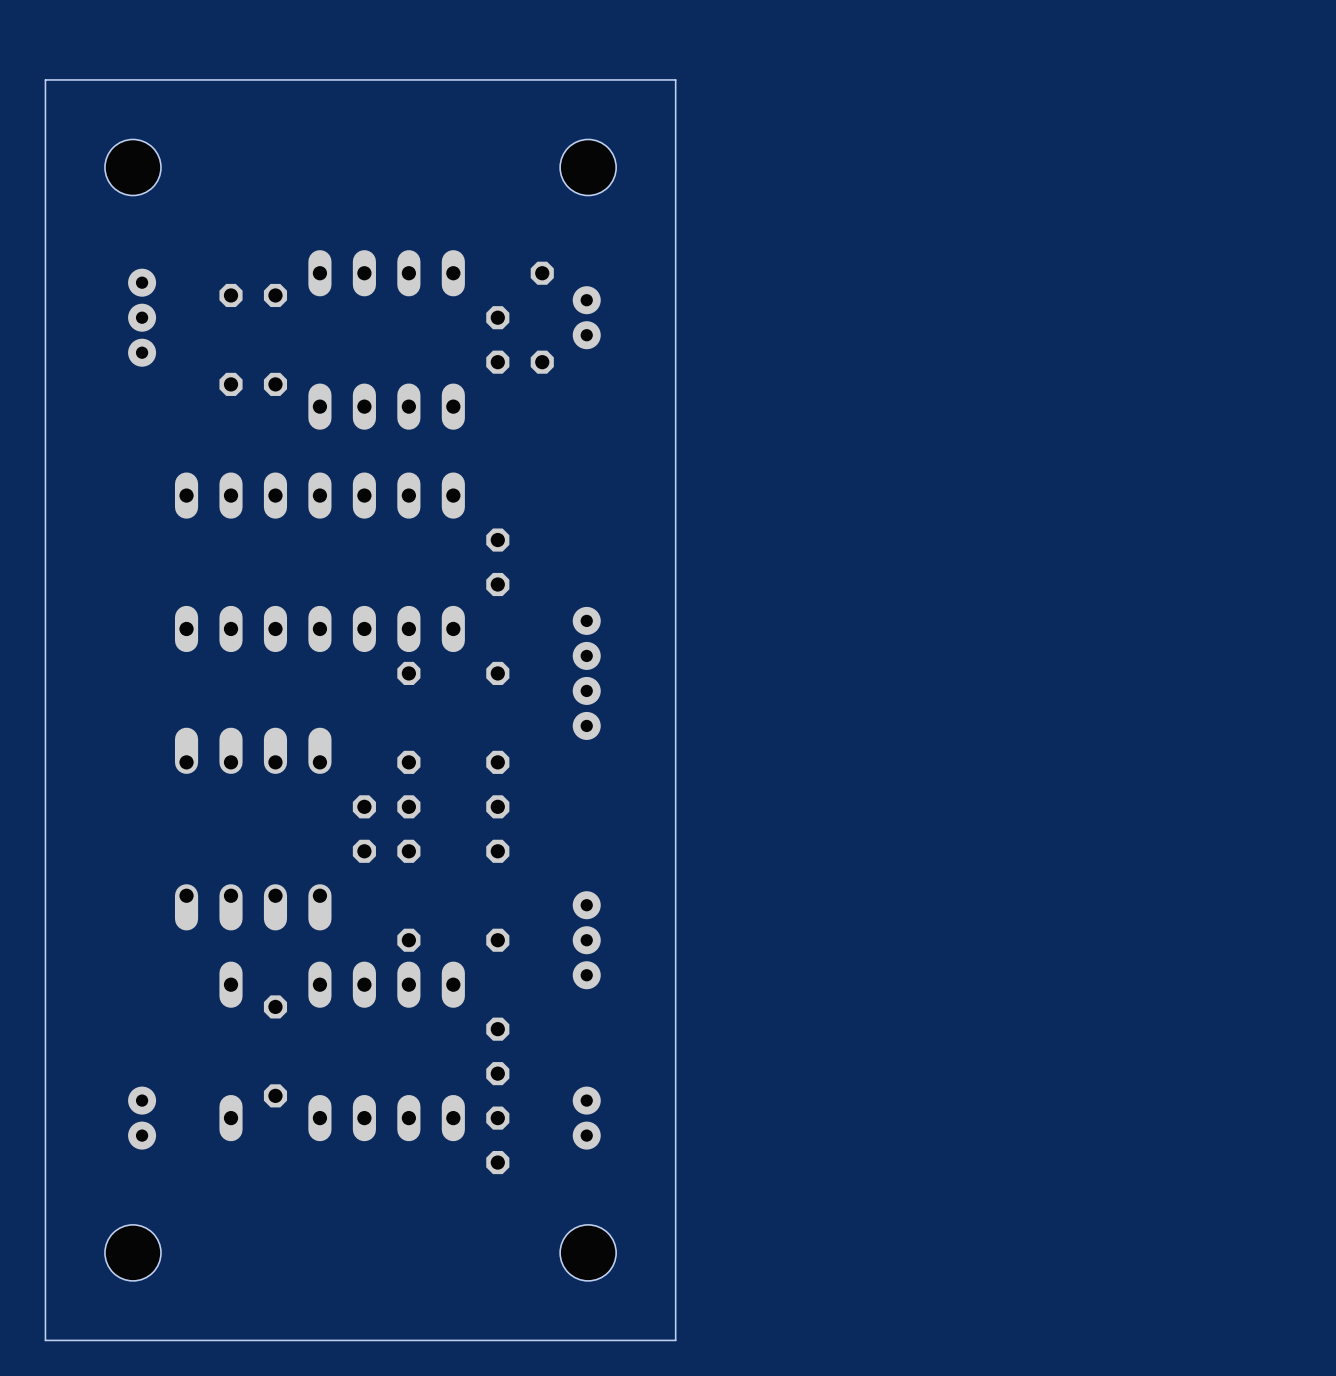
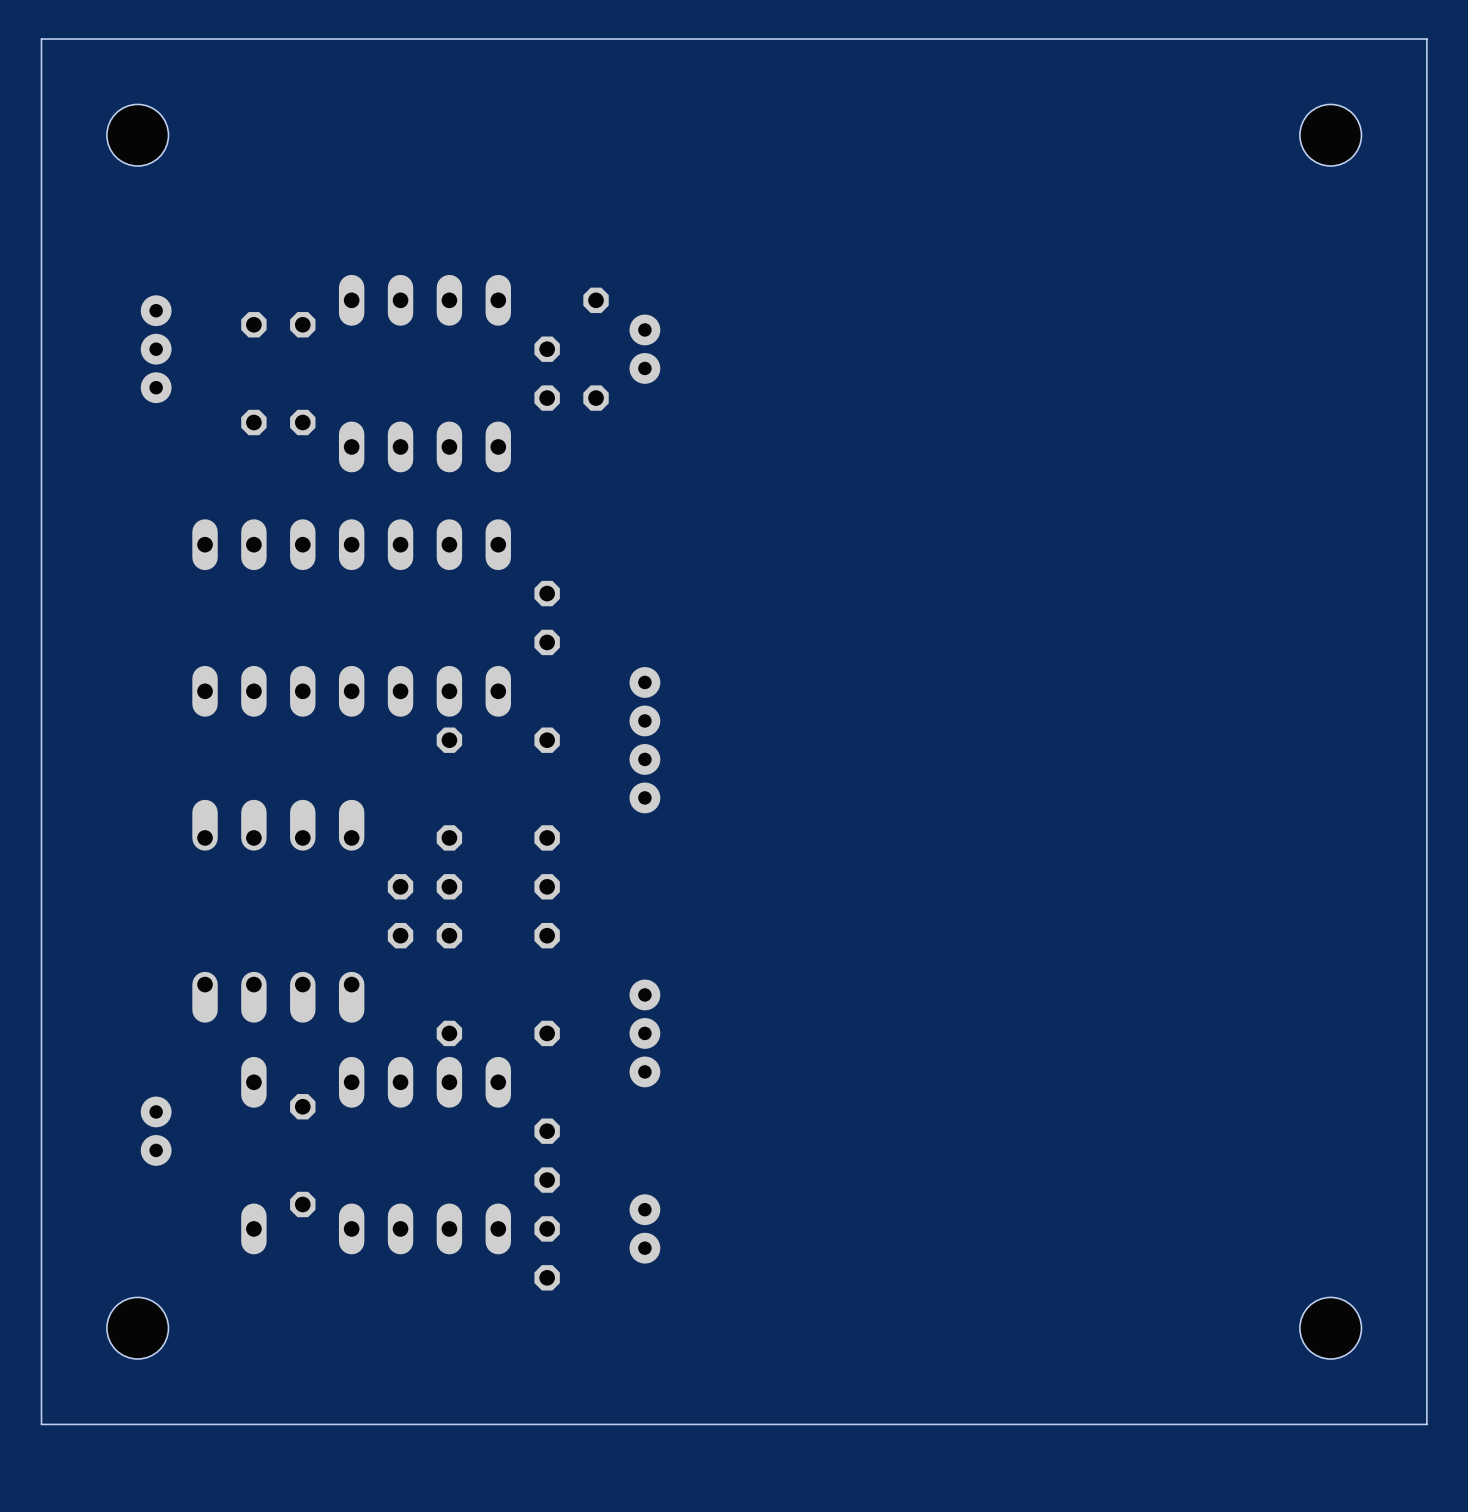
board edge: none -> (1426, 39) (41, 39) (41, 1424) (1426, 1424) (1426, 39)
board edge: (675, 79) (45, 79) (45, 1340) (675, 1340) (675, 79) -> none
hole: none -> (1330, 135)
hole position: (132, 167) -> (137, 135)
hole: (588, 167) -> none
part position: (142, 1118) -> (156, 1131)
hole: none -> (1330, 1328)
hole position: (132, 1252) -> (137, 1328)
hole: (588, 1252) -> none

